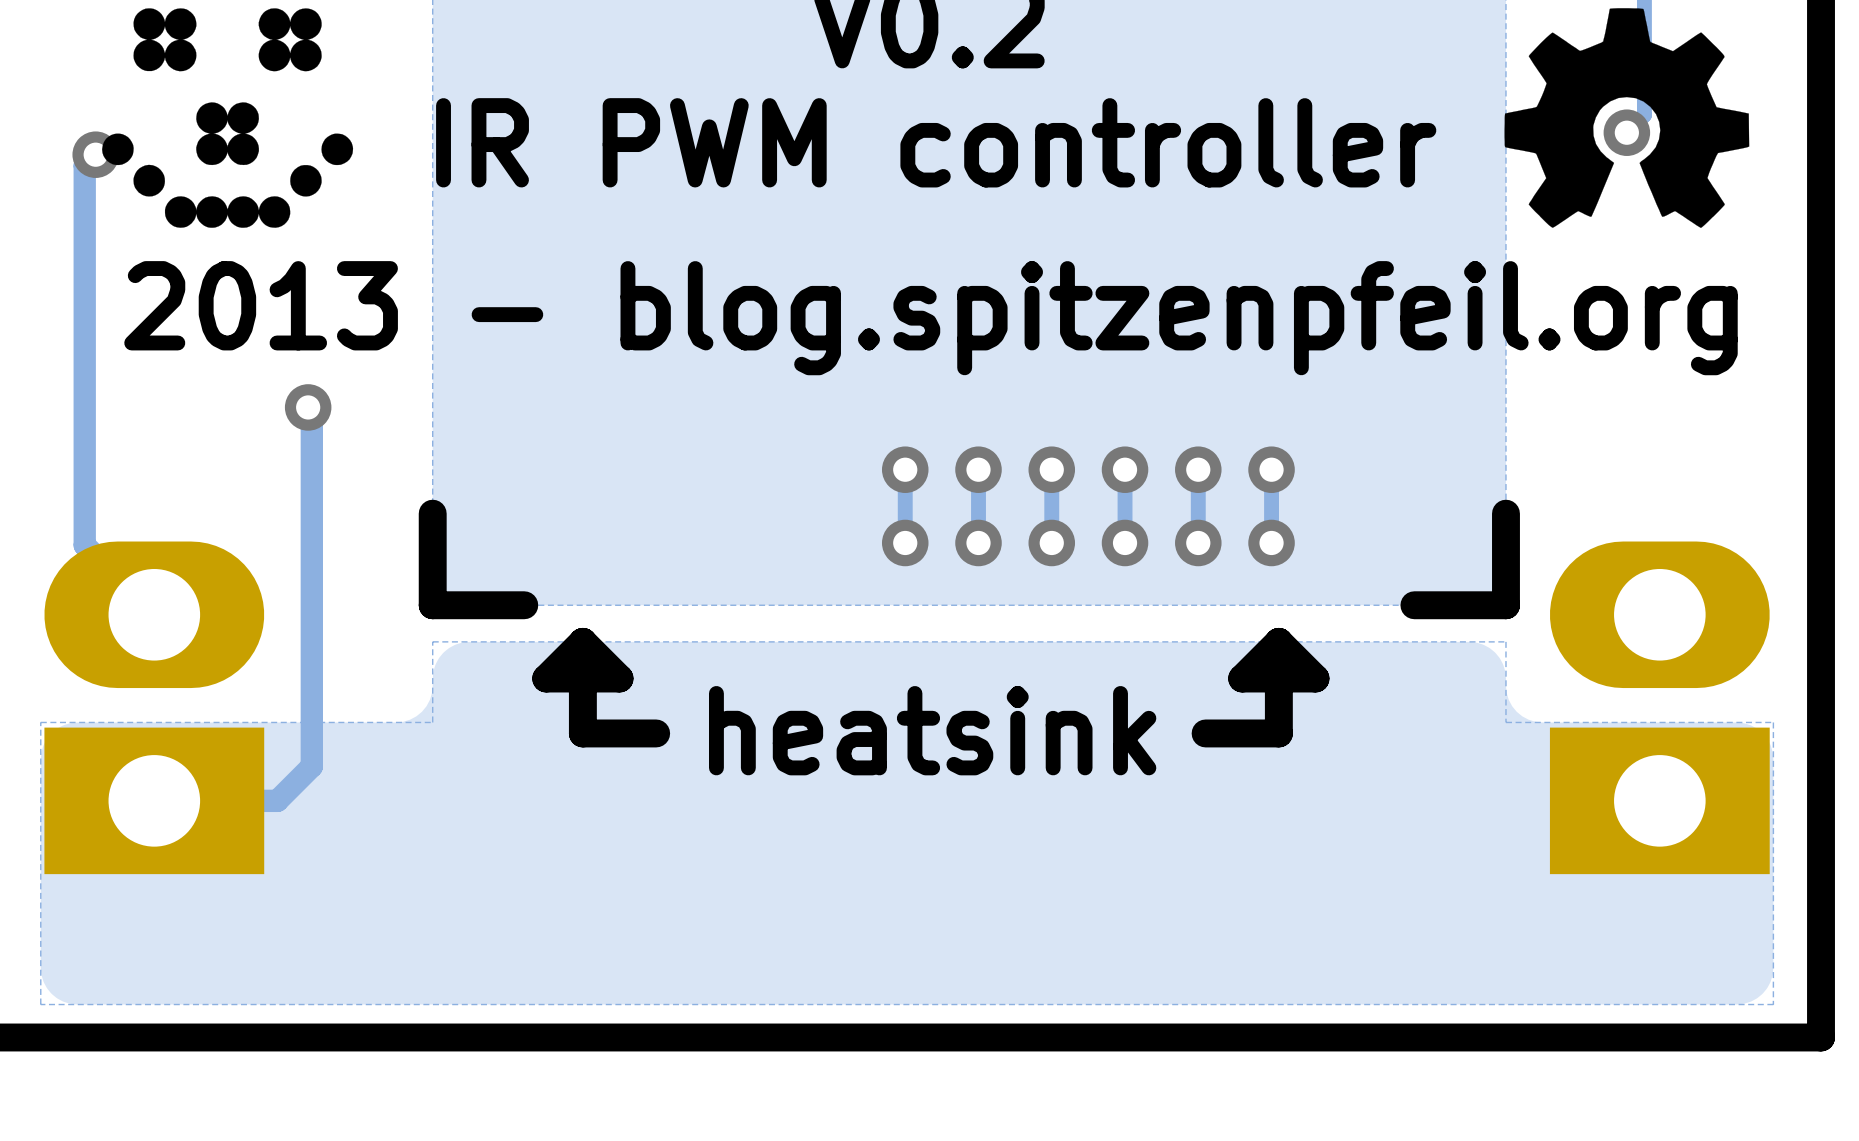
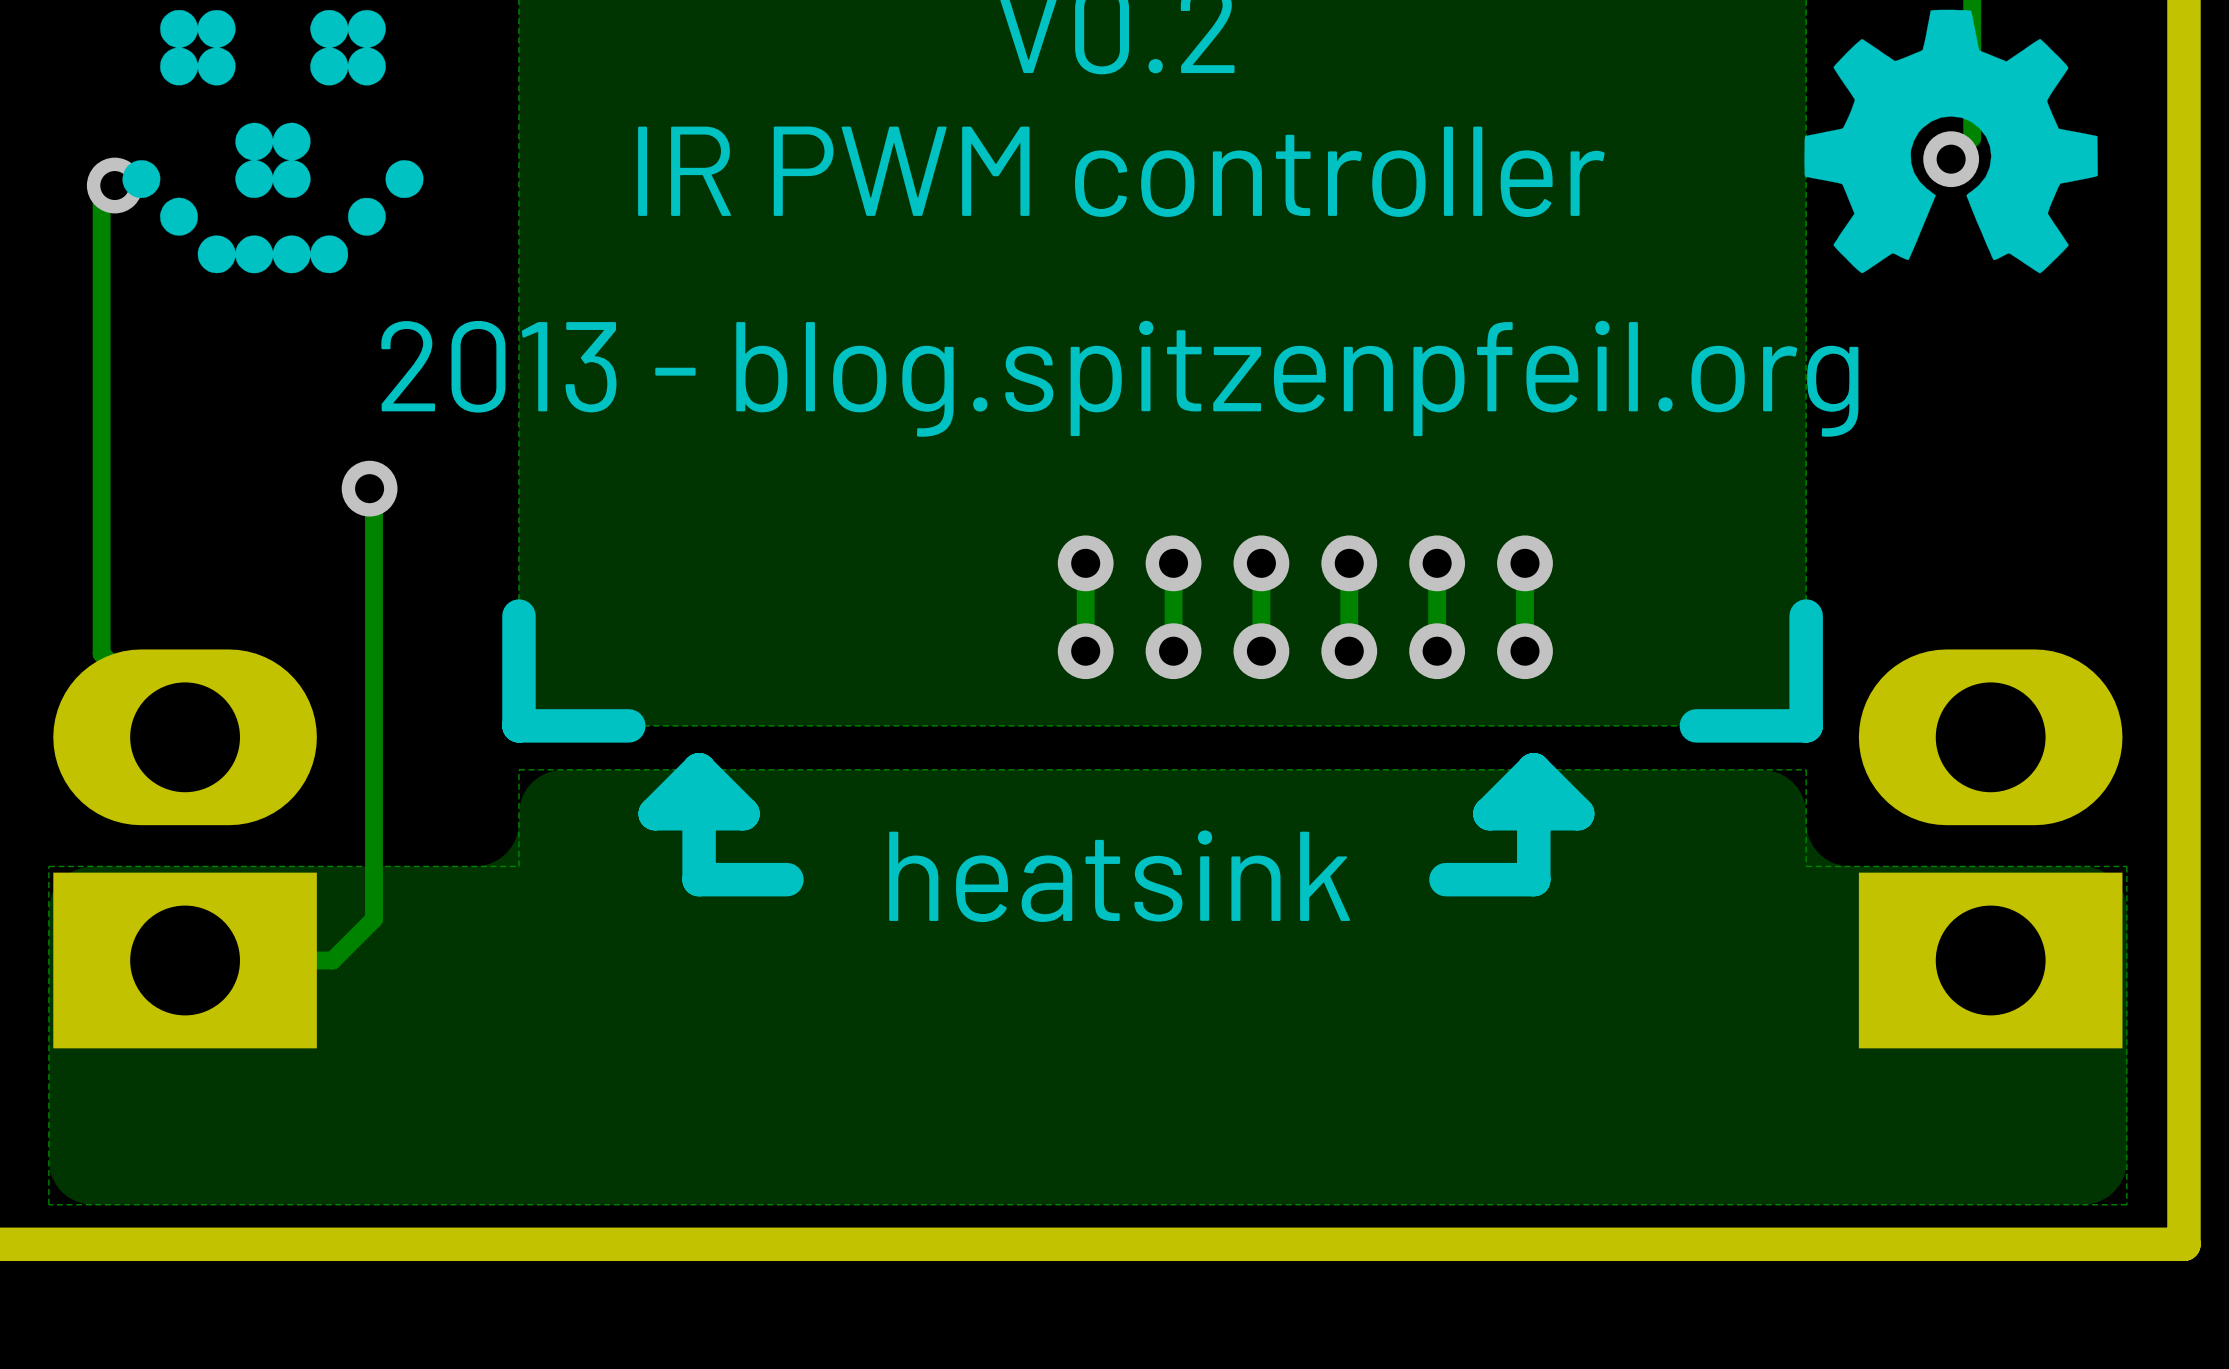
track width: thick (95, 154) (84, 165) (84, 545) (154, 614) -> thin (114, 185) (101, 198) (101, 653) (185, 737)
track width: thick (308, 407) (311, 411) (311, 766) (277, 800) (154, 800) -> thin (369, 488) (373, 493) (373, 919) (332, 960) (185, 960)

